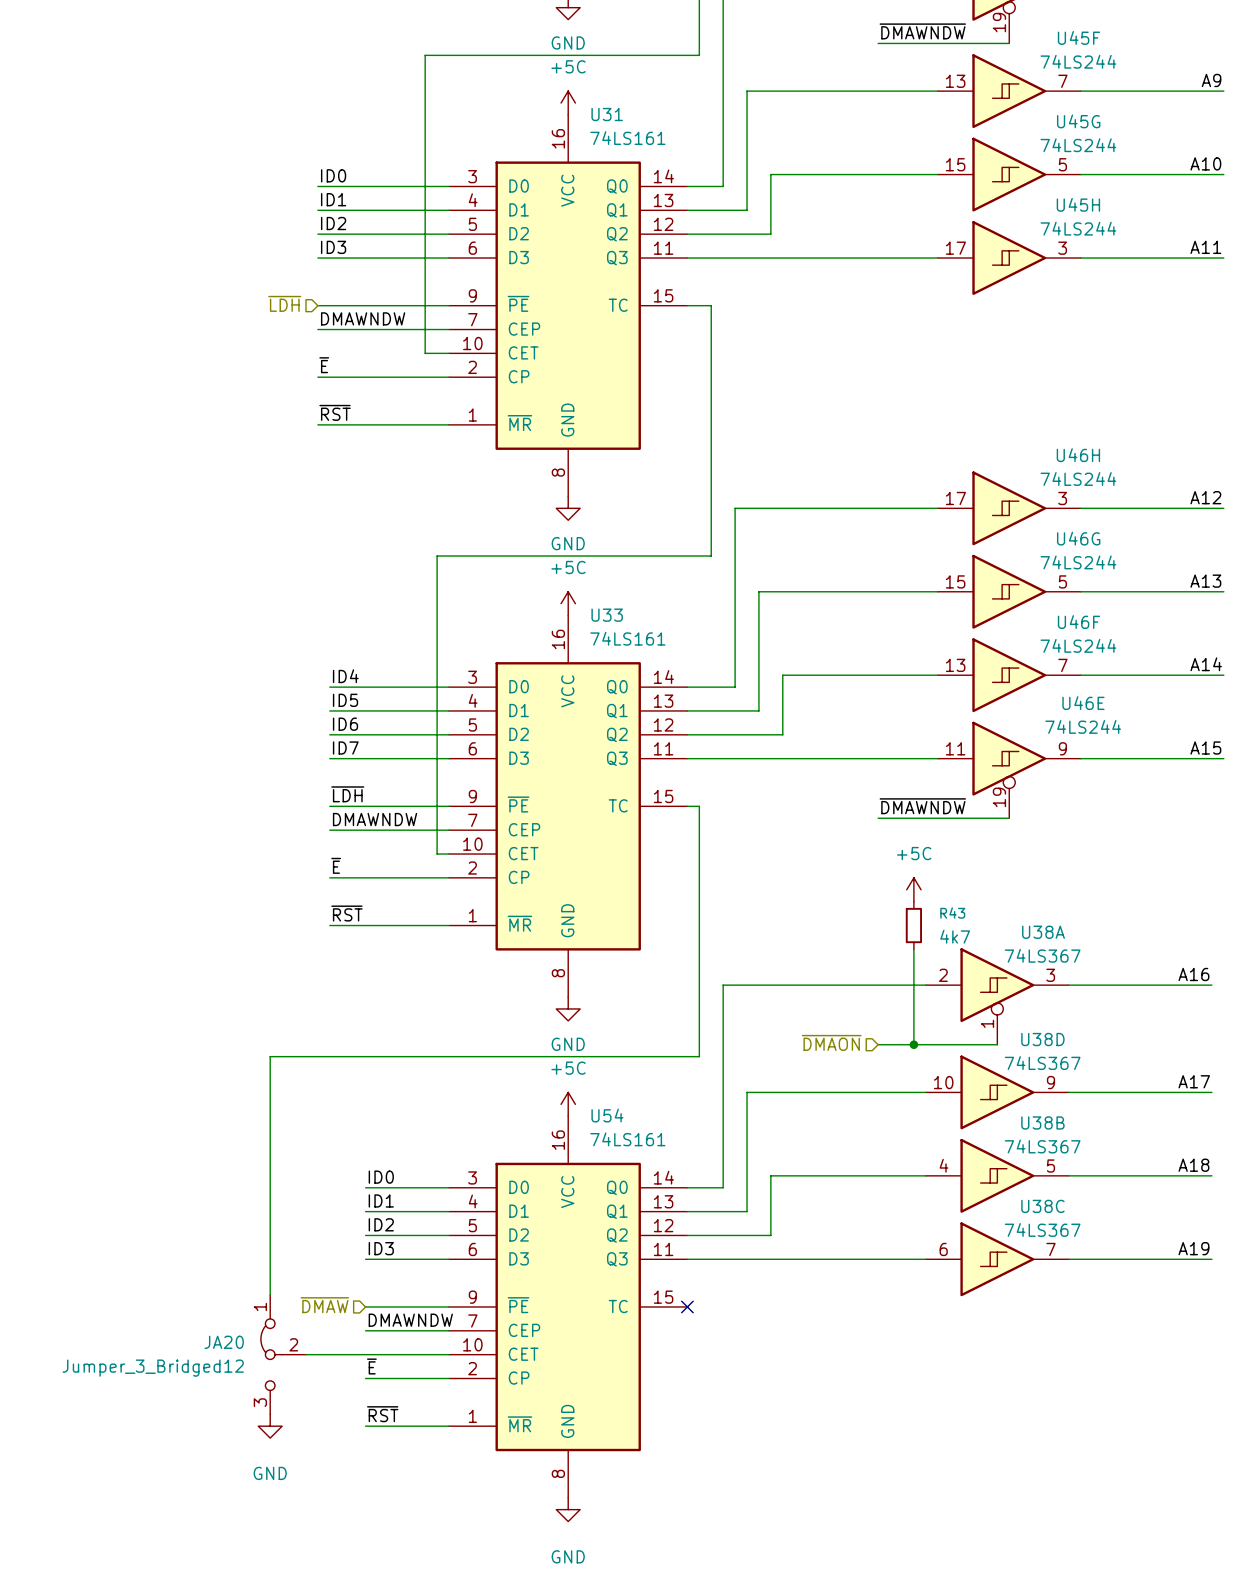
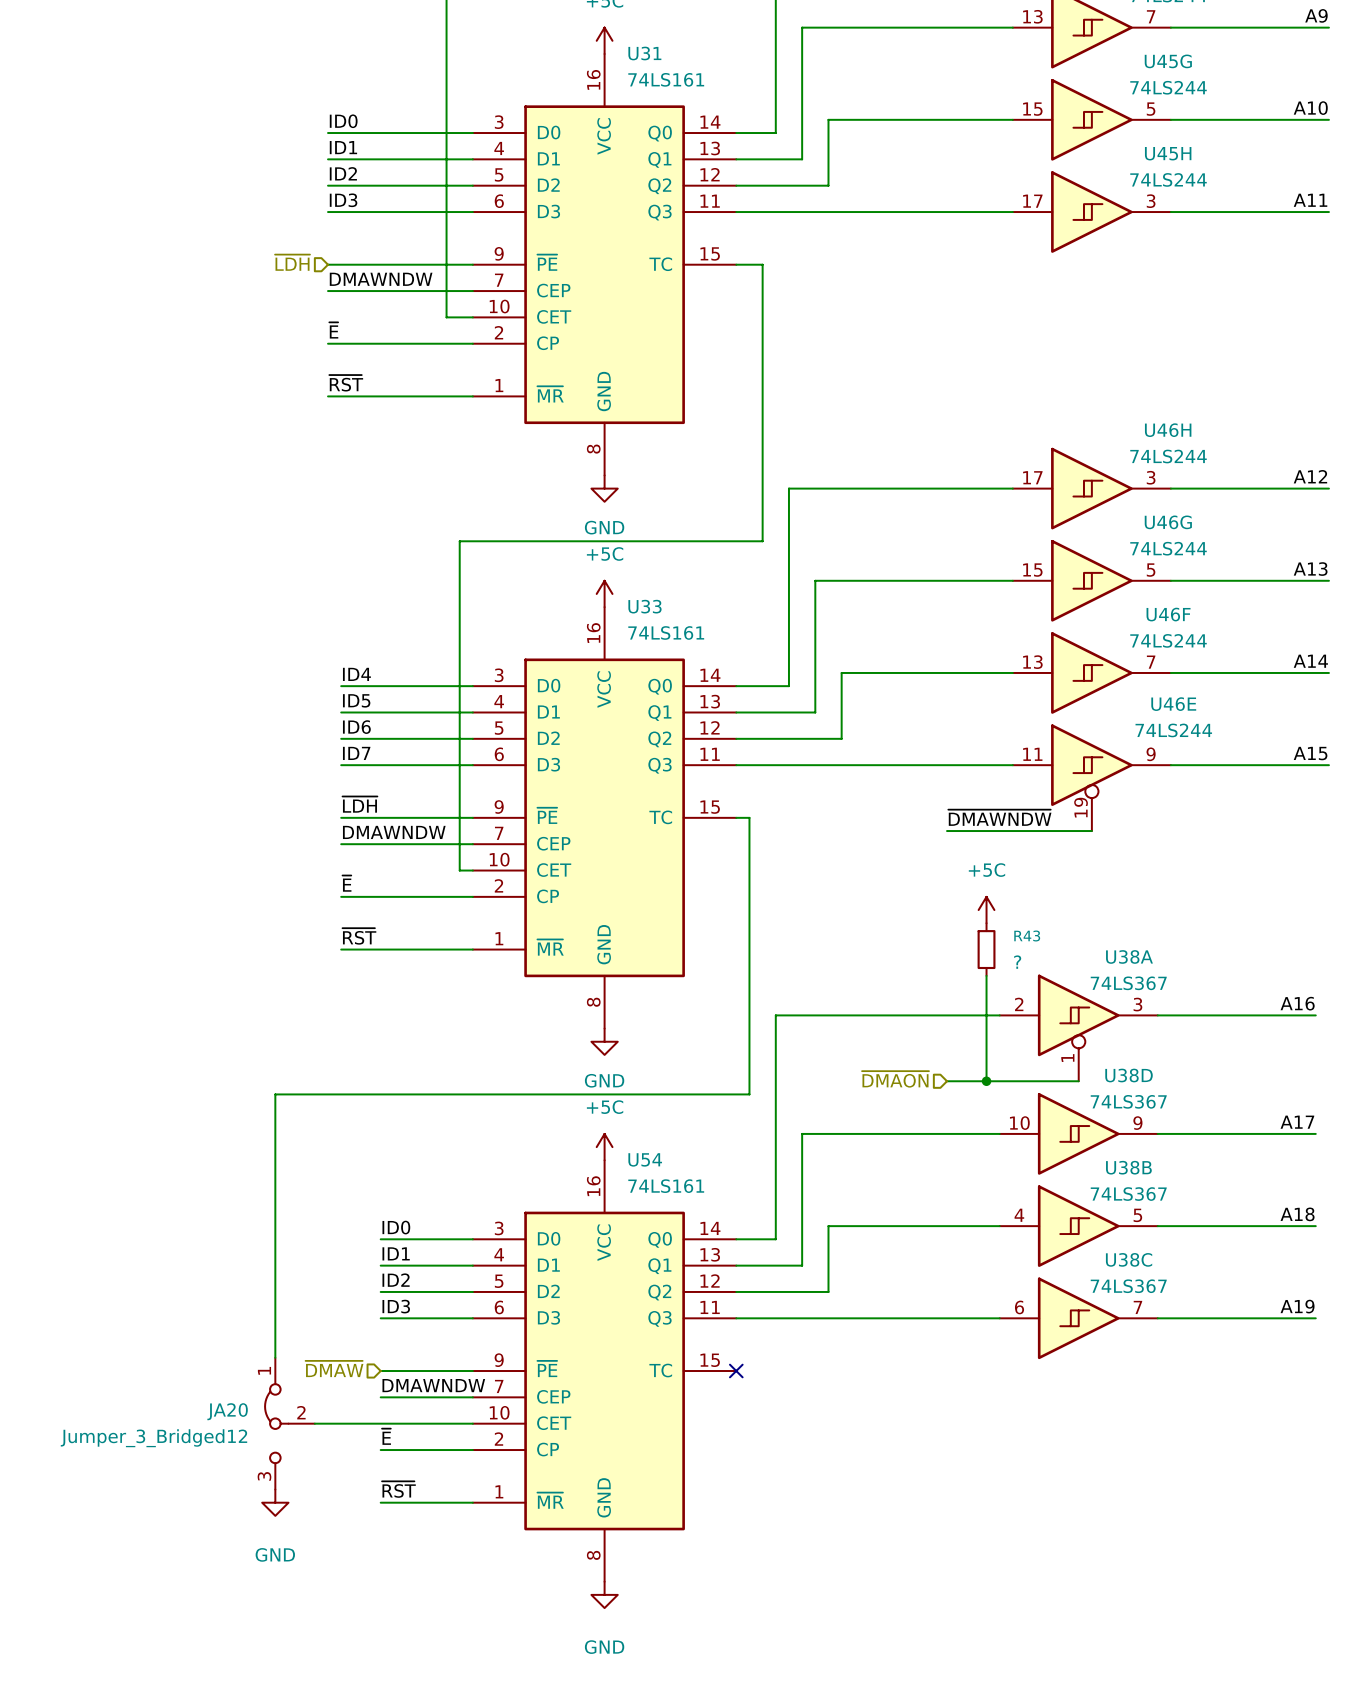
R43 value: 4k7 (955, 936) -> ? (1017, 962)

